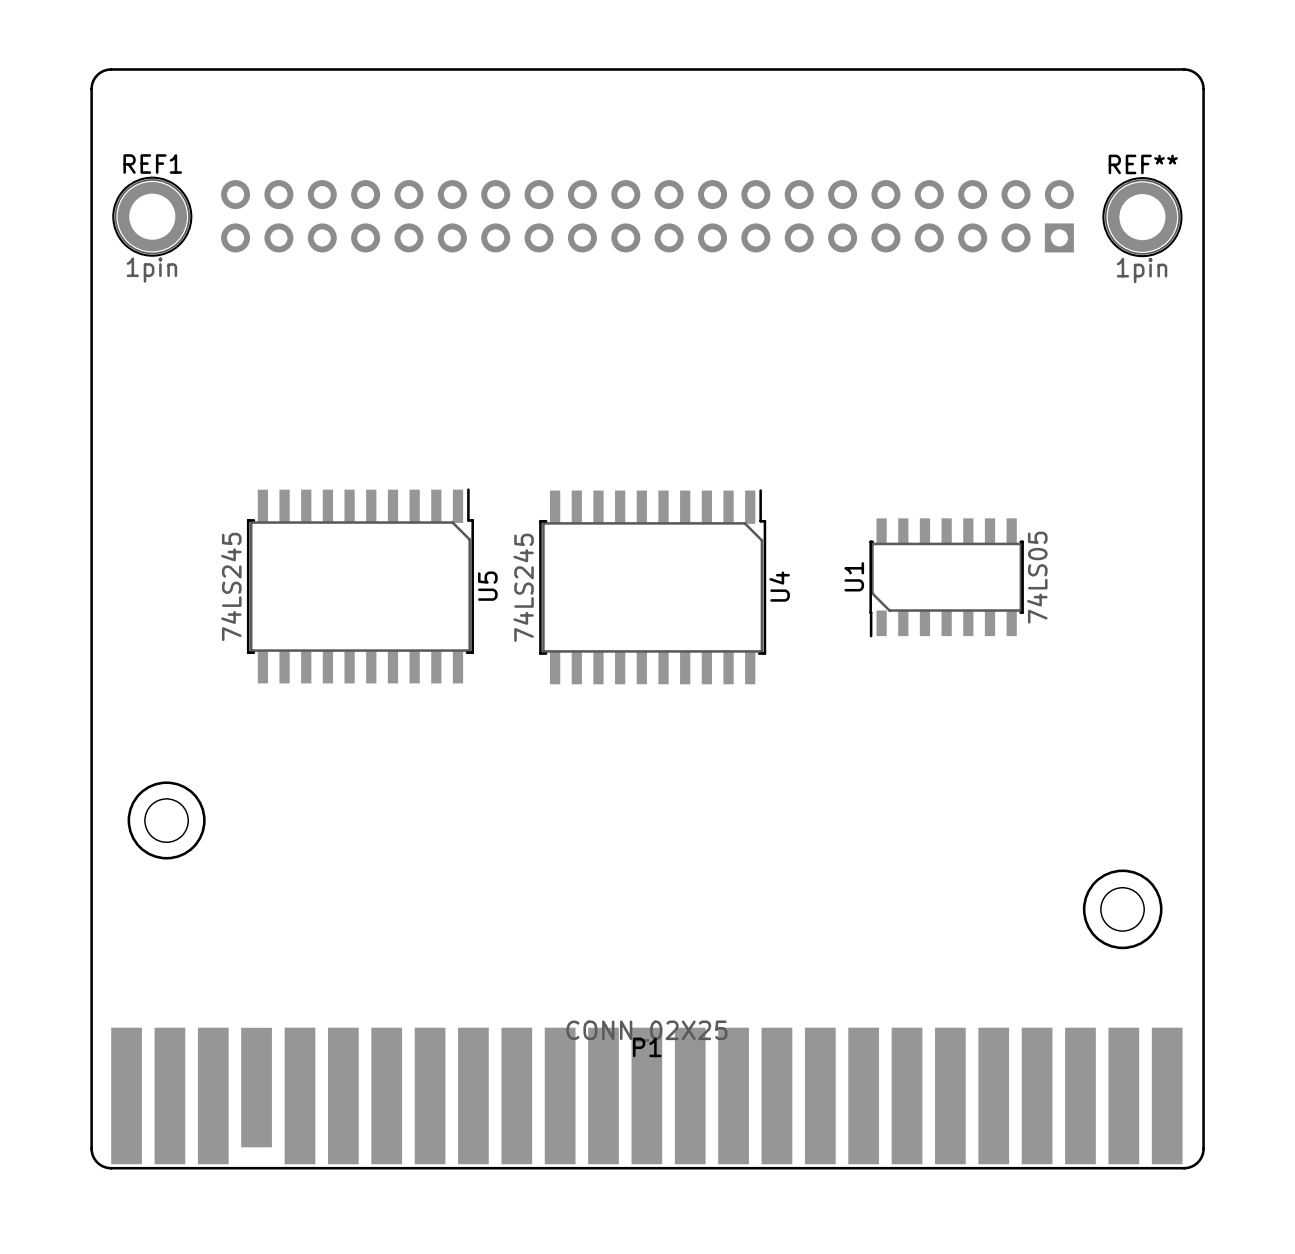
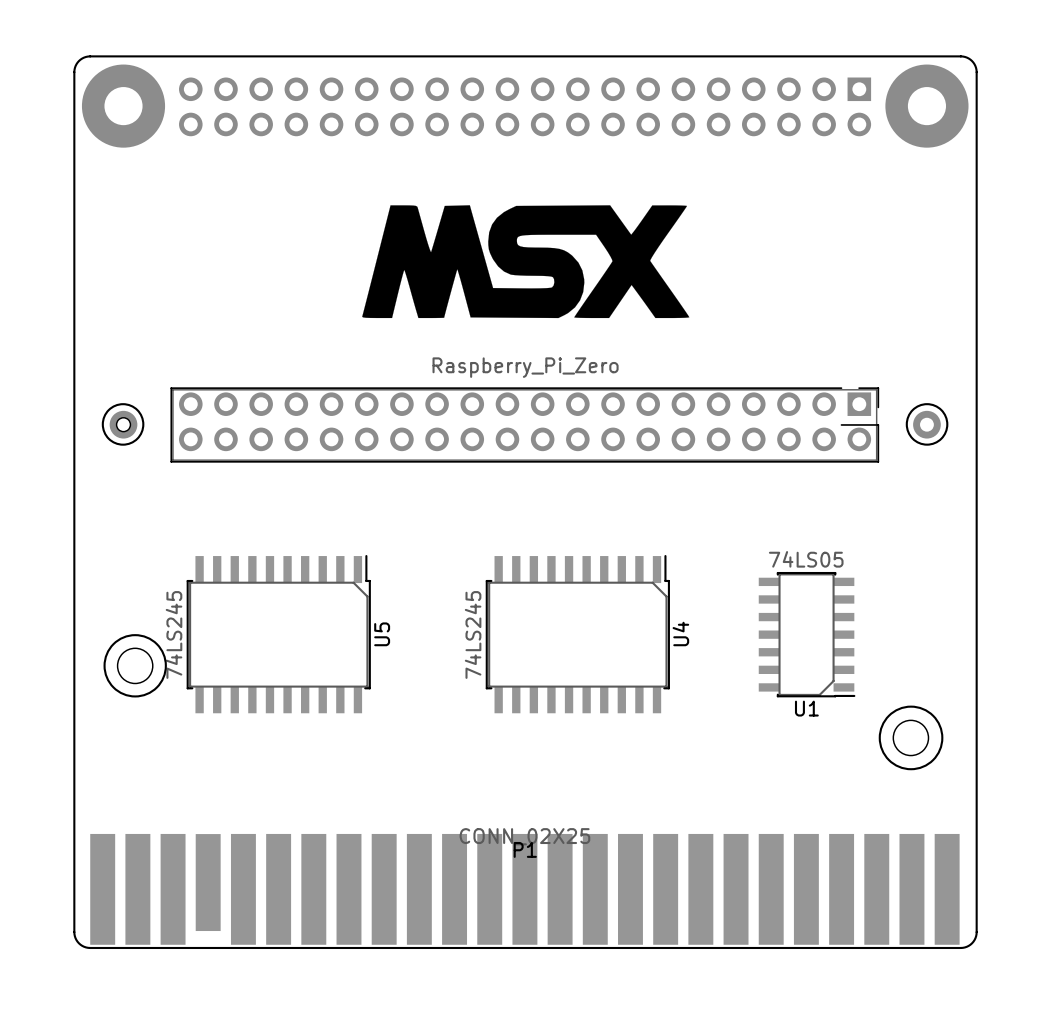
part: none -> (525, 106)
REF1: 1pin (152, 216) -> none
part: (647, 216) -> none
REF**: 1pin (1142, 217) -> none
drawing: none -> [362, 205, 690, 319]
part: none -> Raspberry_Pi_Zero (525, 263)
round board edge: none -> [101, 403, 145, 446]
round board edge: none -> [905, 403, 949, 446]
part: none -> (525, 421)
U1 rotation: 0° (946, 577) -> 90° counterclockwise (807, 634)
U1 position: (946, 577) -> (807, 634)
U5 position: (360, 585) -> (278, 634)
U4 position: (652, 586) -> (577, 634)

